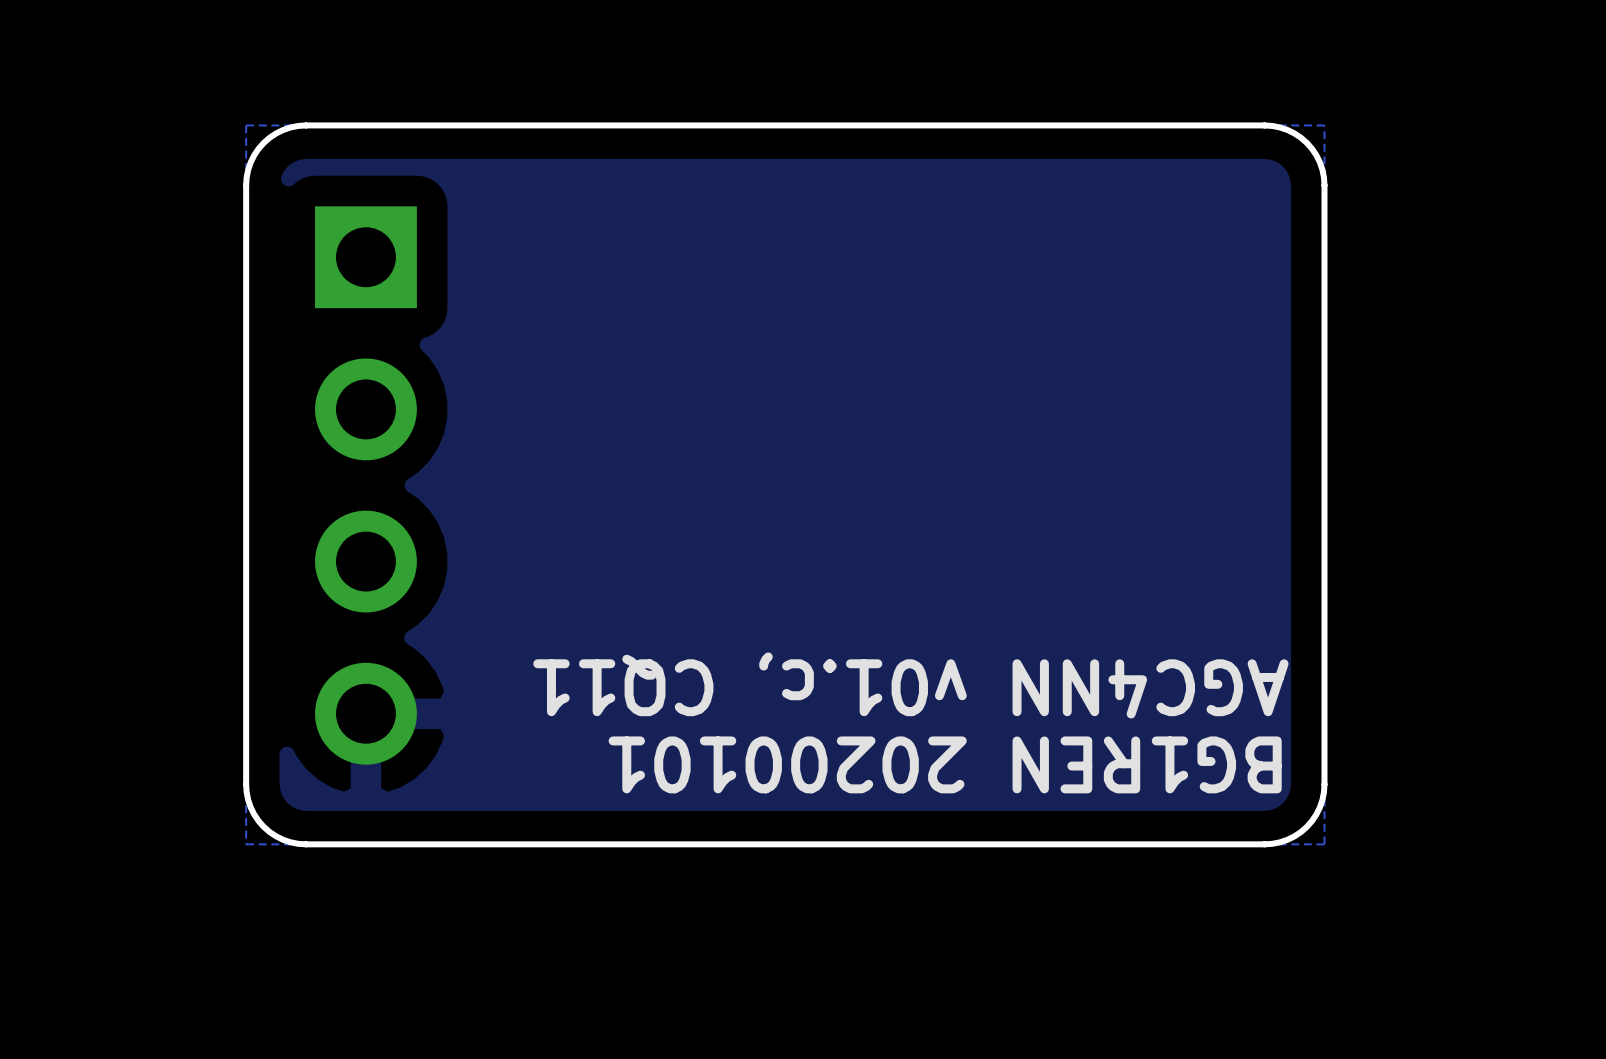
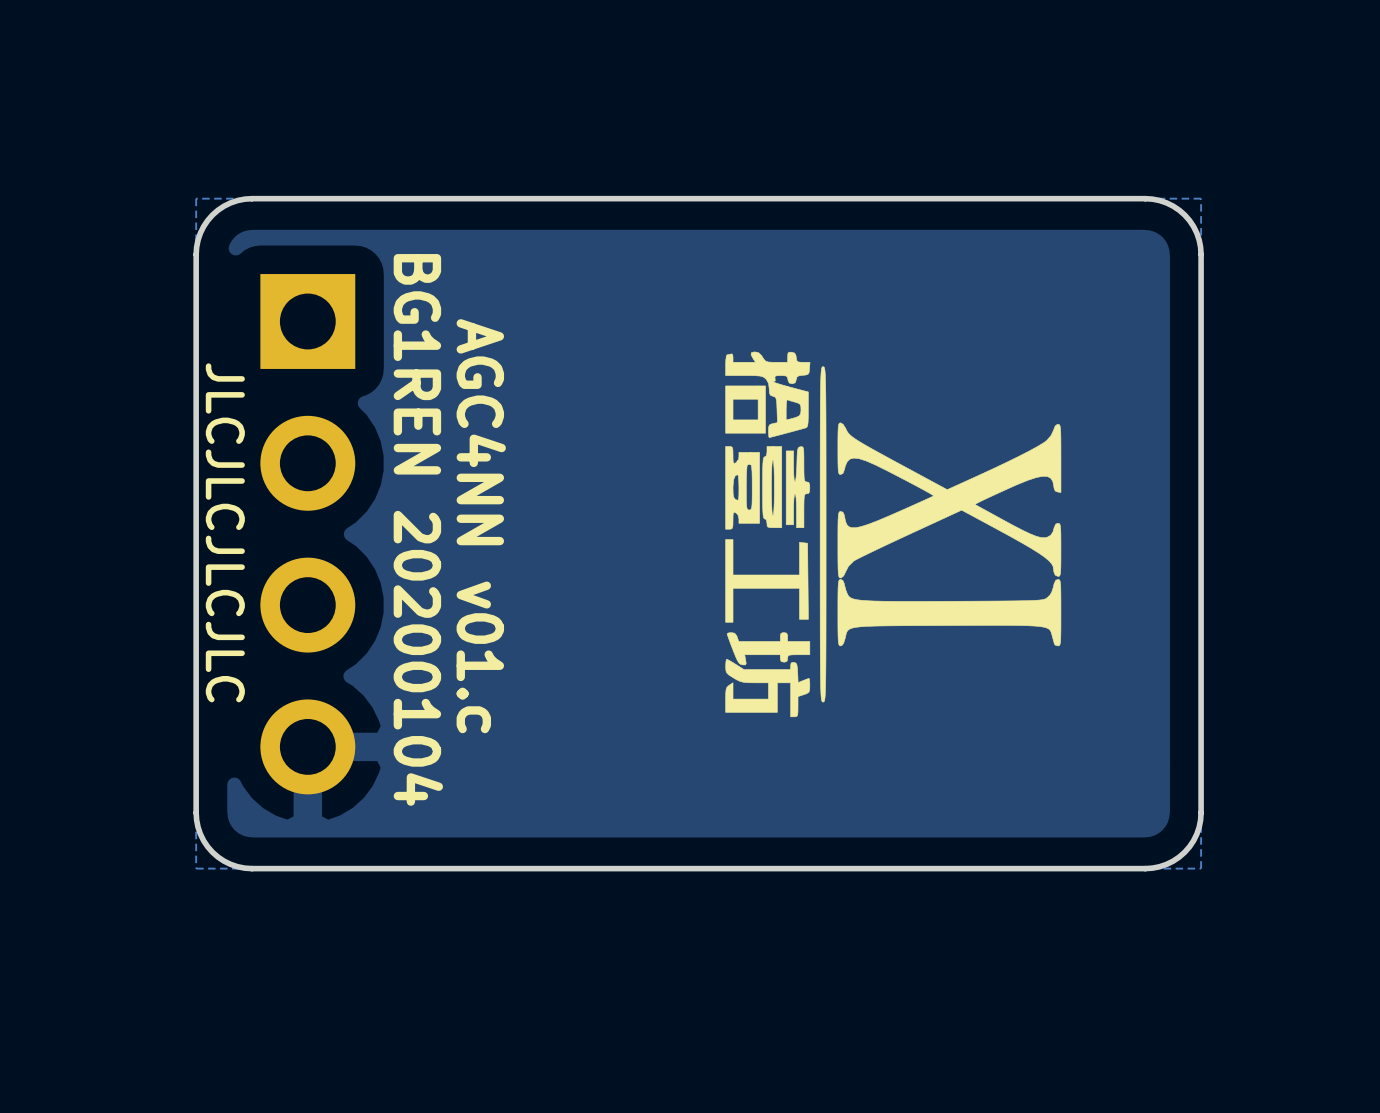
drawing: none -> [725, 351, 1062, 718]
text: none -> BG1REN 20200104 (418, 529)
text: none -> JLCJLCJLCJLC (225, 532)
text: AGC4NN v01.c, CQ11 (910, 685) -> AGC4NN v01.c (481, 526)
text: BG1REN 20200101 (945, 764) -> none

